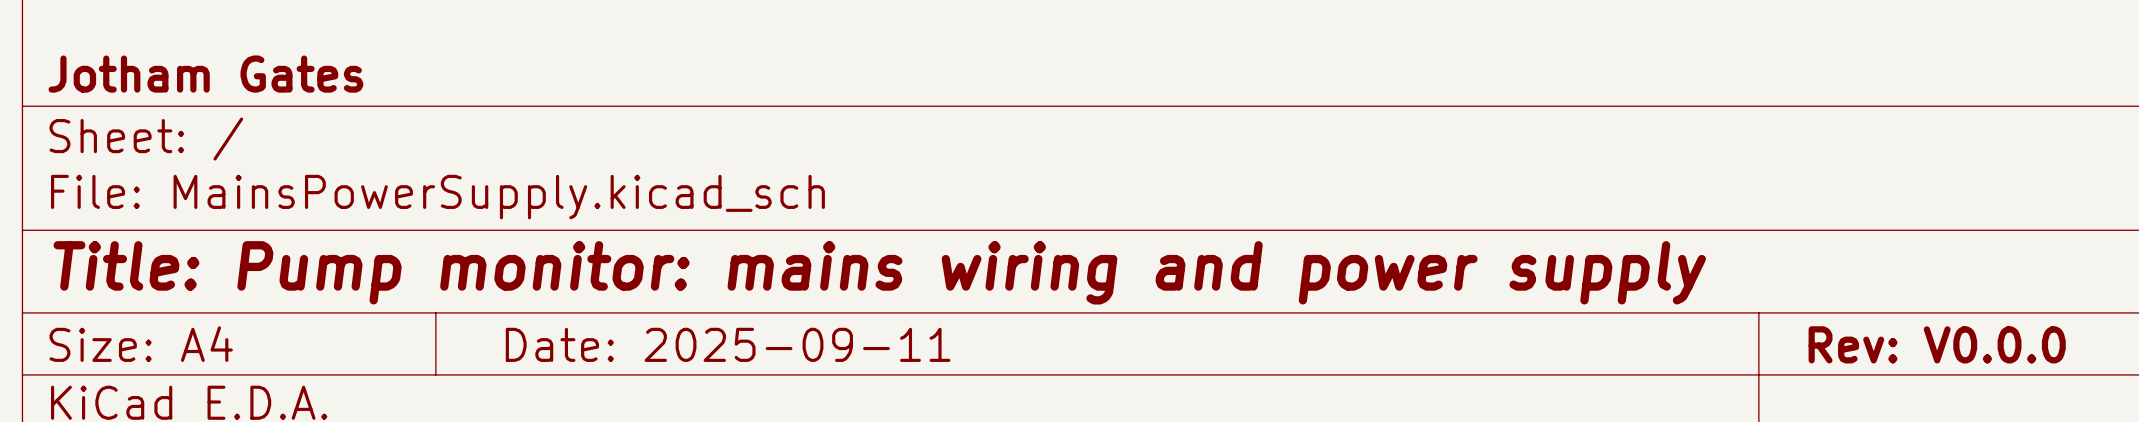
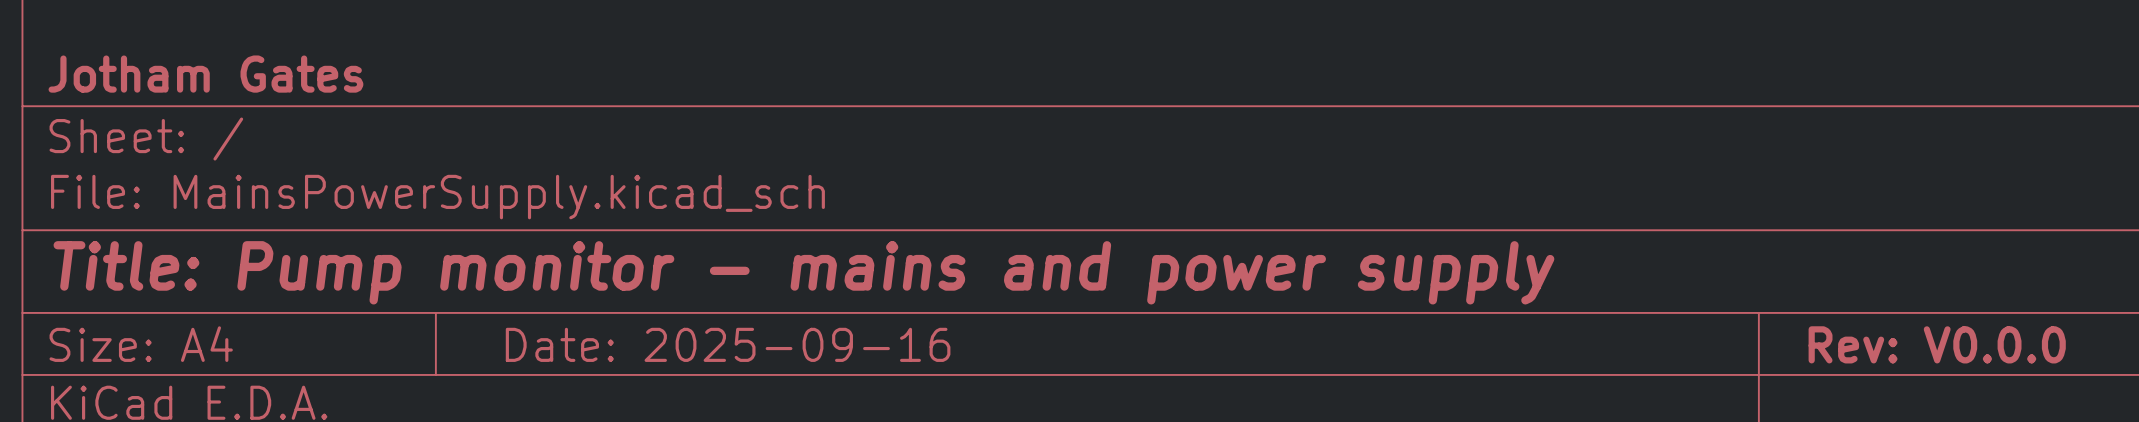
title block: Title: Pump monitor: mains wiring and power supply (879, 272) -> Title: Pump monitor - mains and power supply (803, 272)
title block: Date: 2025-09-11 (728, 344) -> Date: 2025-09-16 (728, 344)

